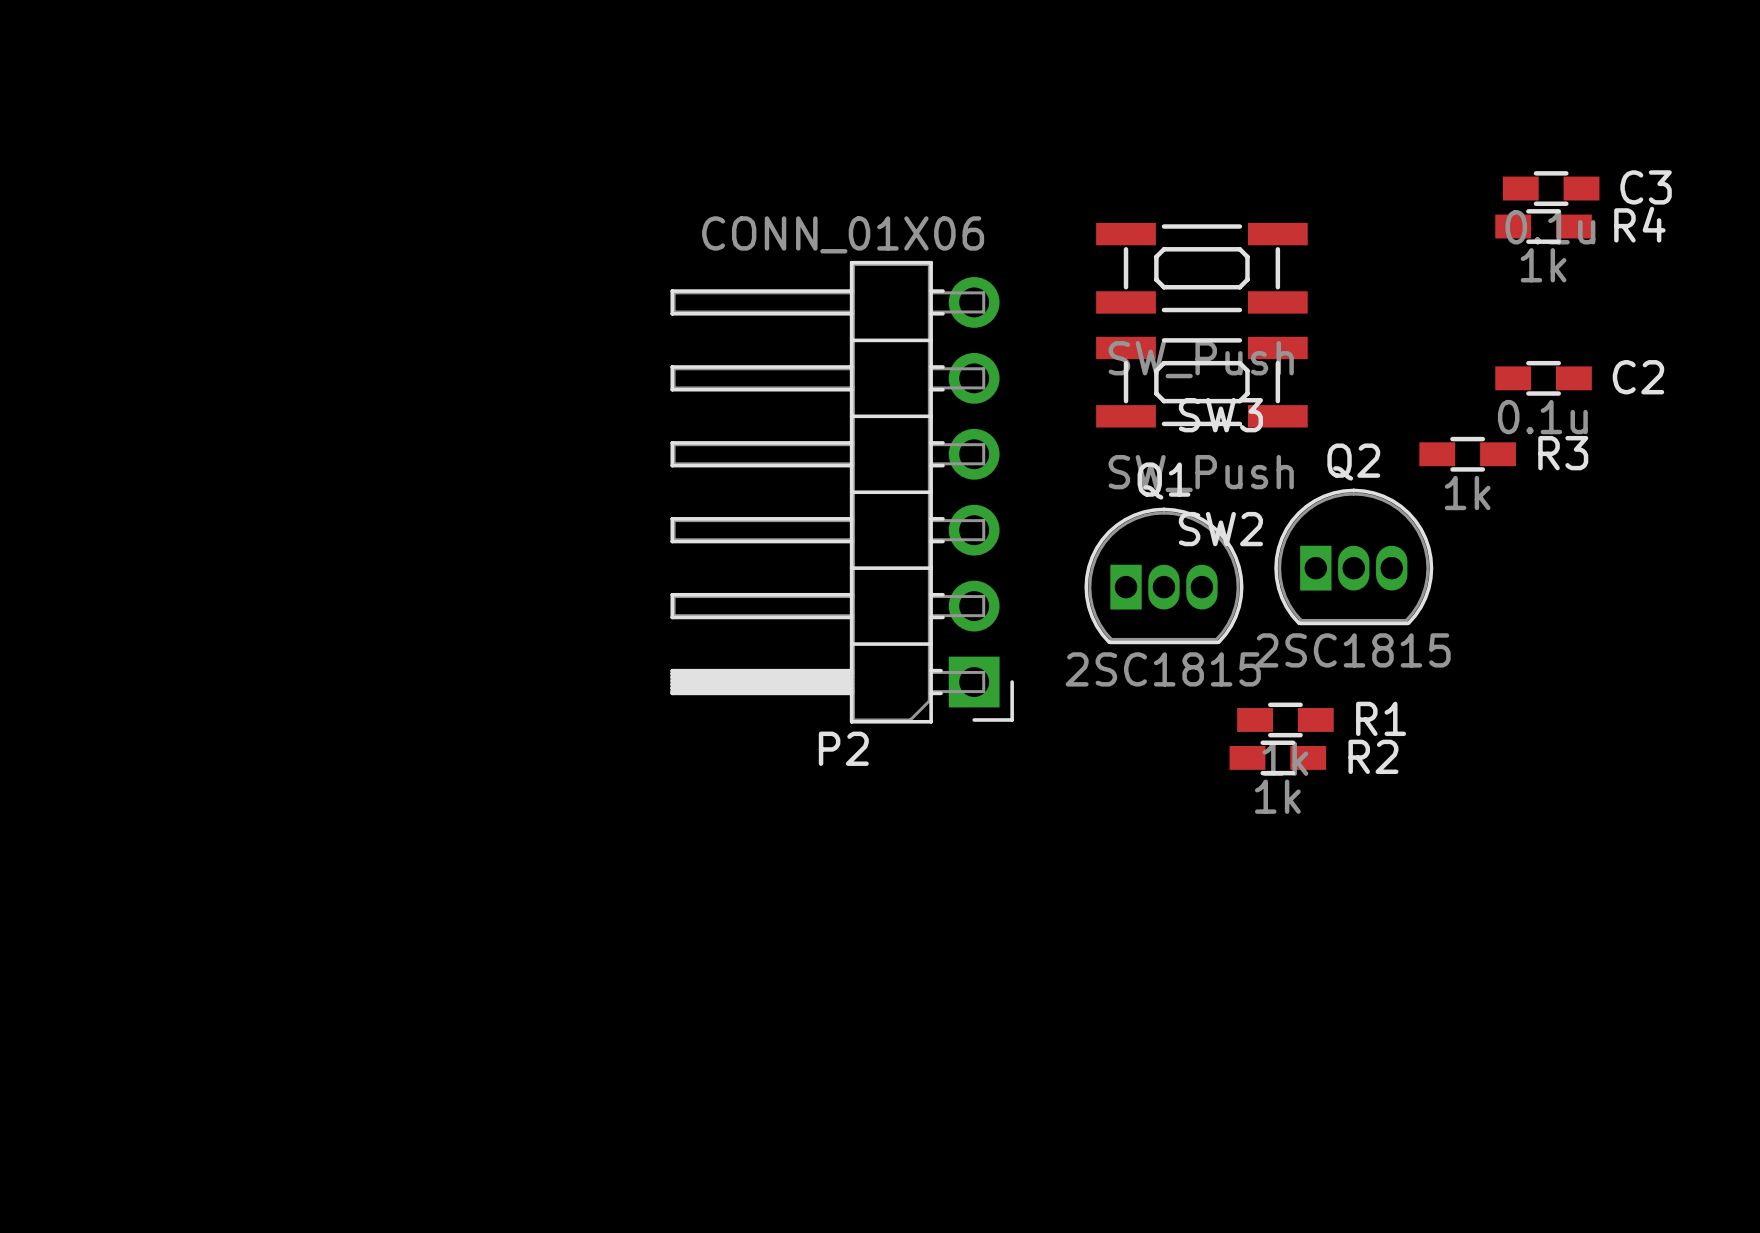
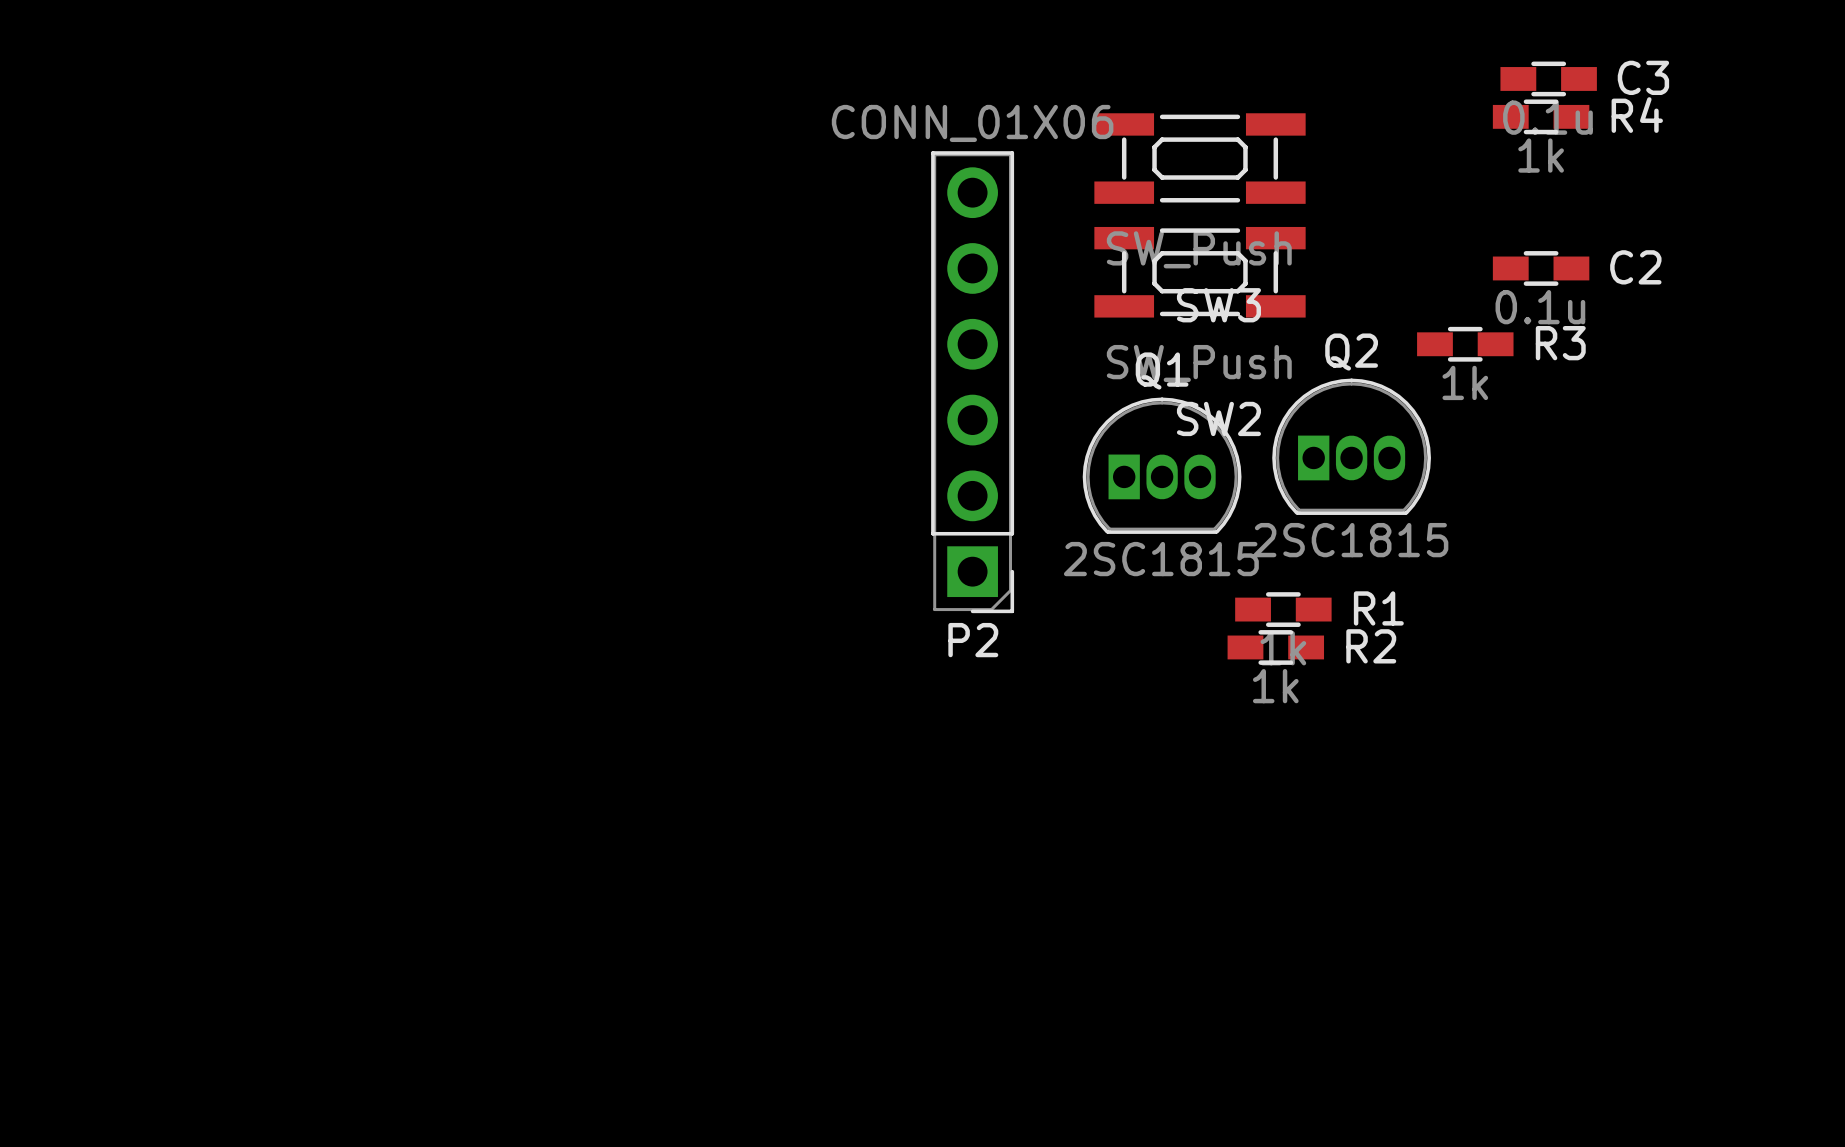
P2 footprint: [670, 260, 1014, 724] -> [931, 151, 1015, 614]

